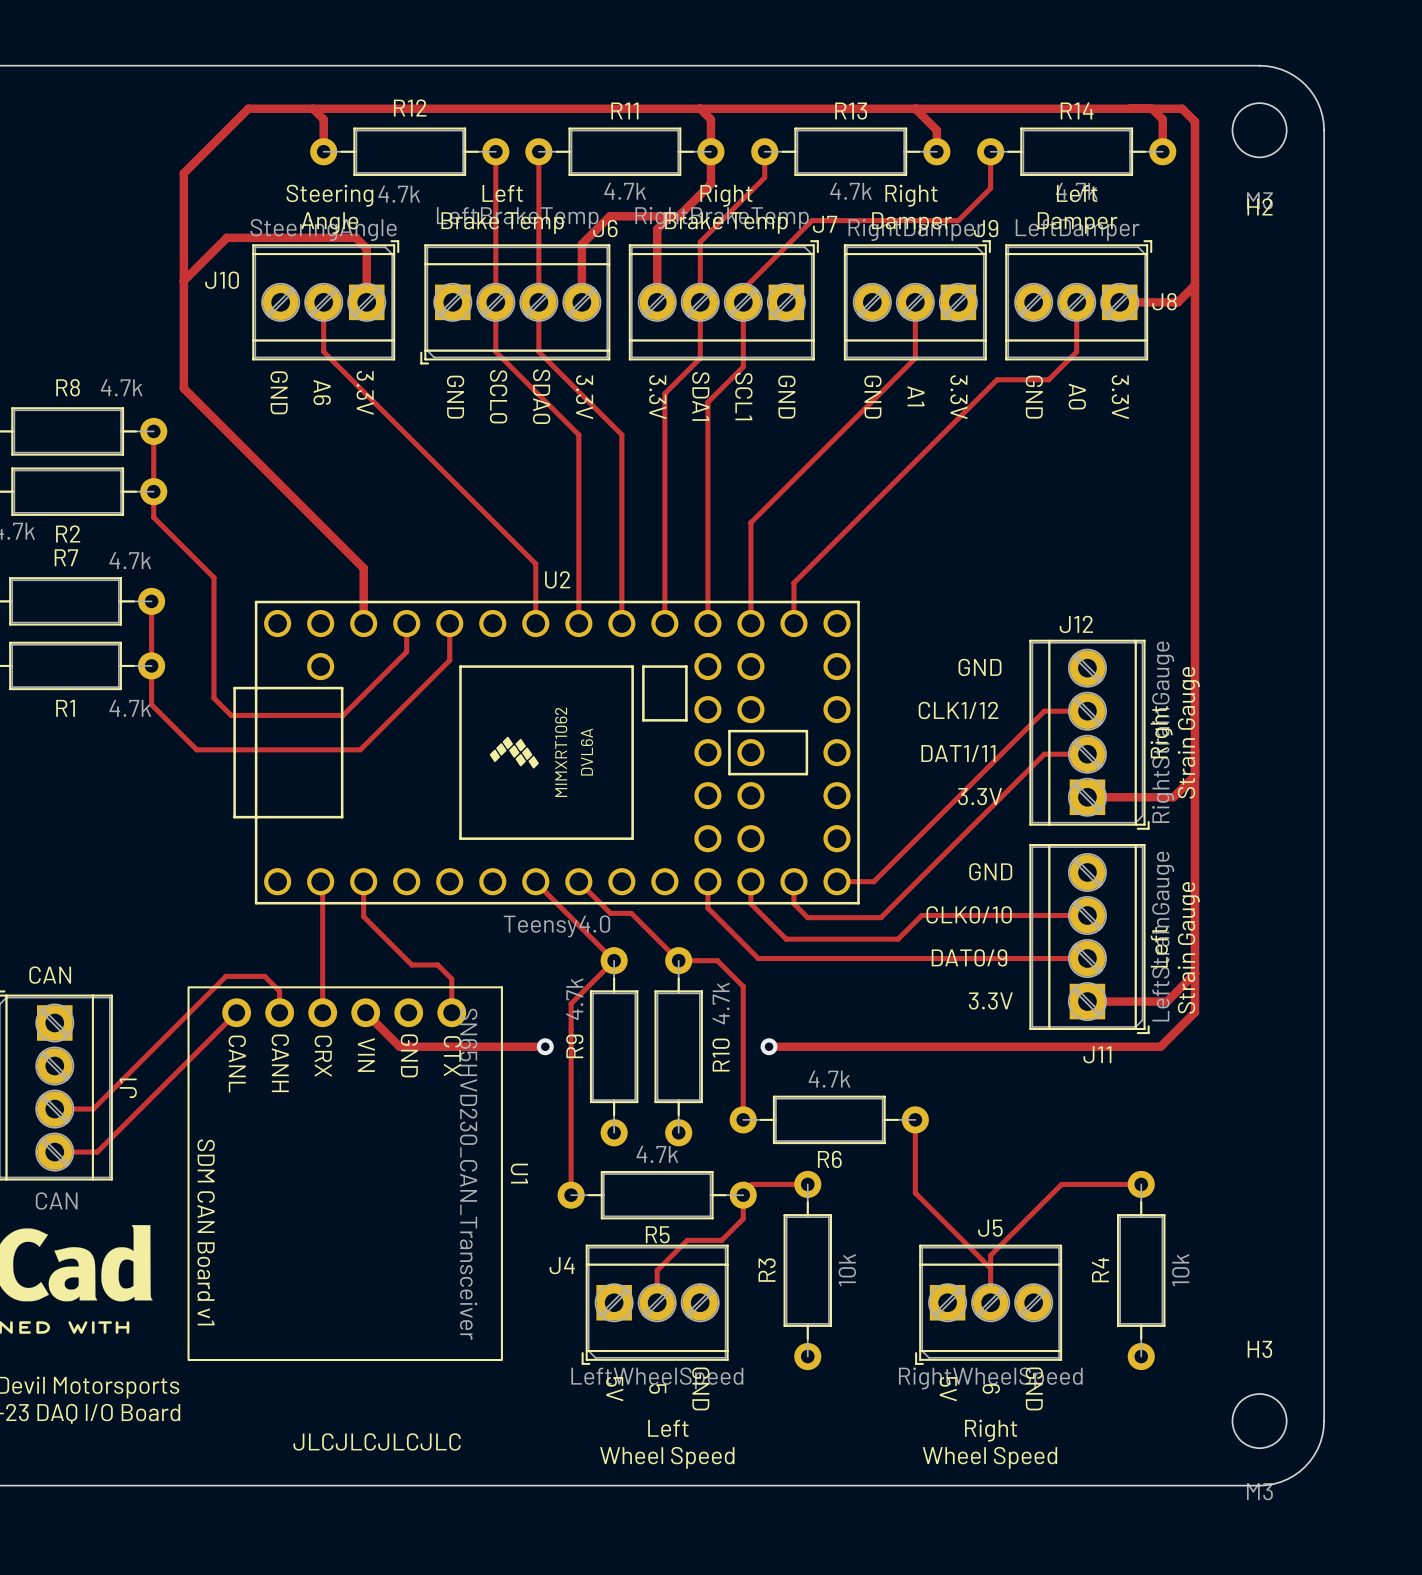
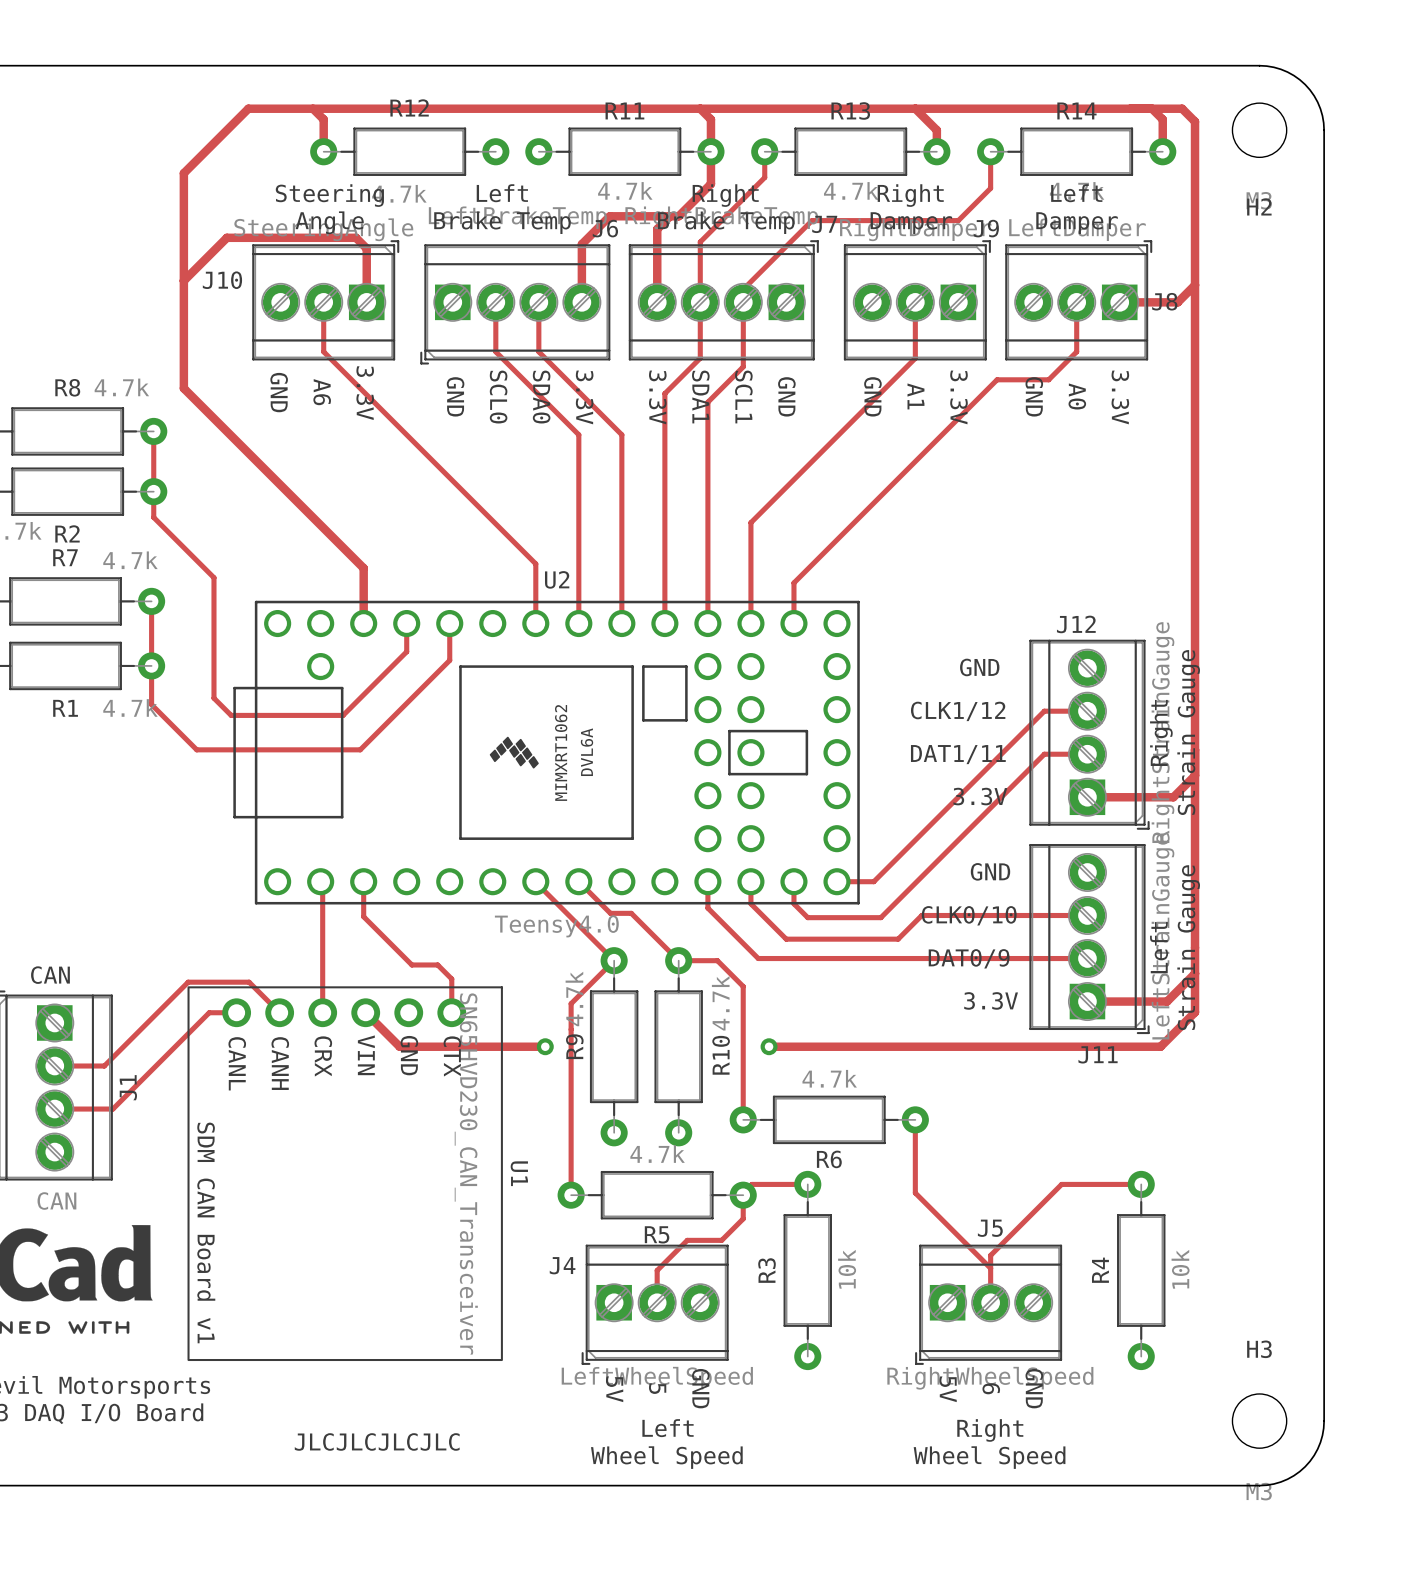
track: (495, 151) (495, 302) -> none
track: (538, 151) (538, 302) -> none
track: (236, 1012) (97, 1152) (54, 1152) -> none
track: (279, 1012) (279, 991) (264, 976) (225, 976) (93, 1109) -> (236, 1012) (209, 1012) (112, 1109) (93, 1109)
track: none -> (279, 1012) (249, 982) (188, 982) (104, 1066) (54, 1066)

